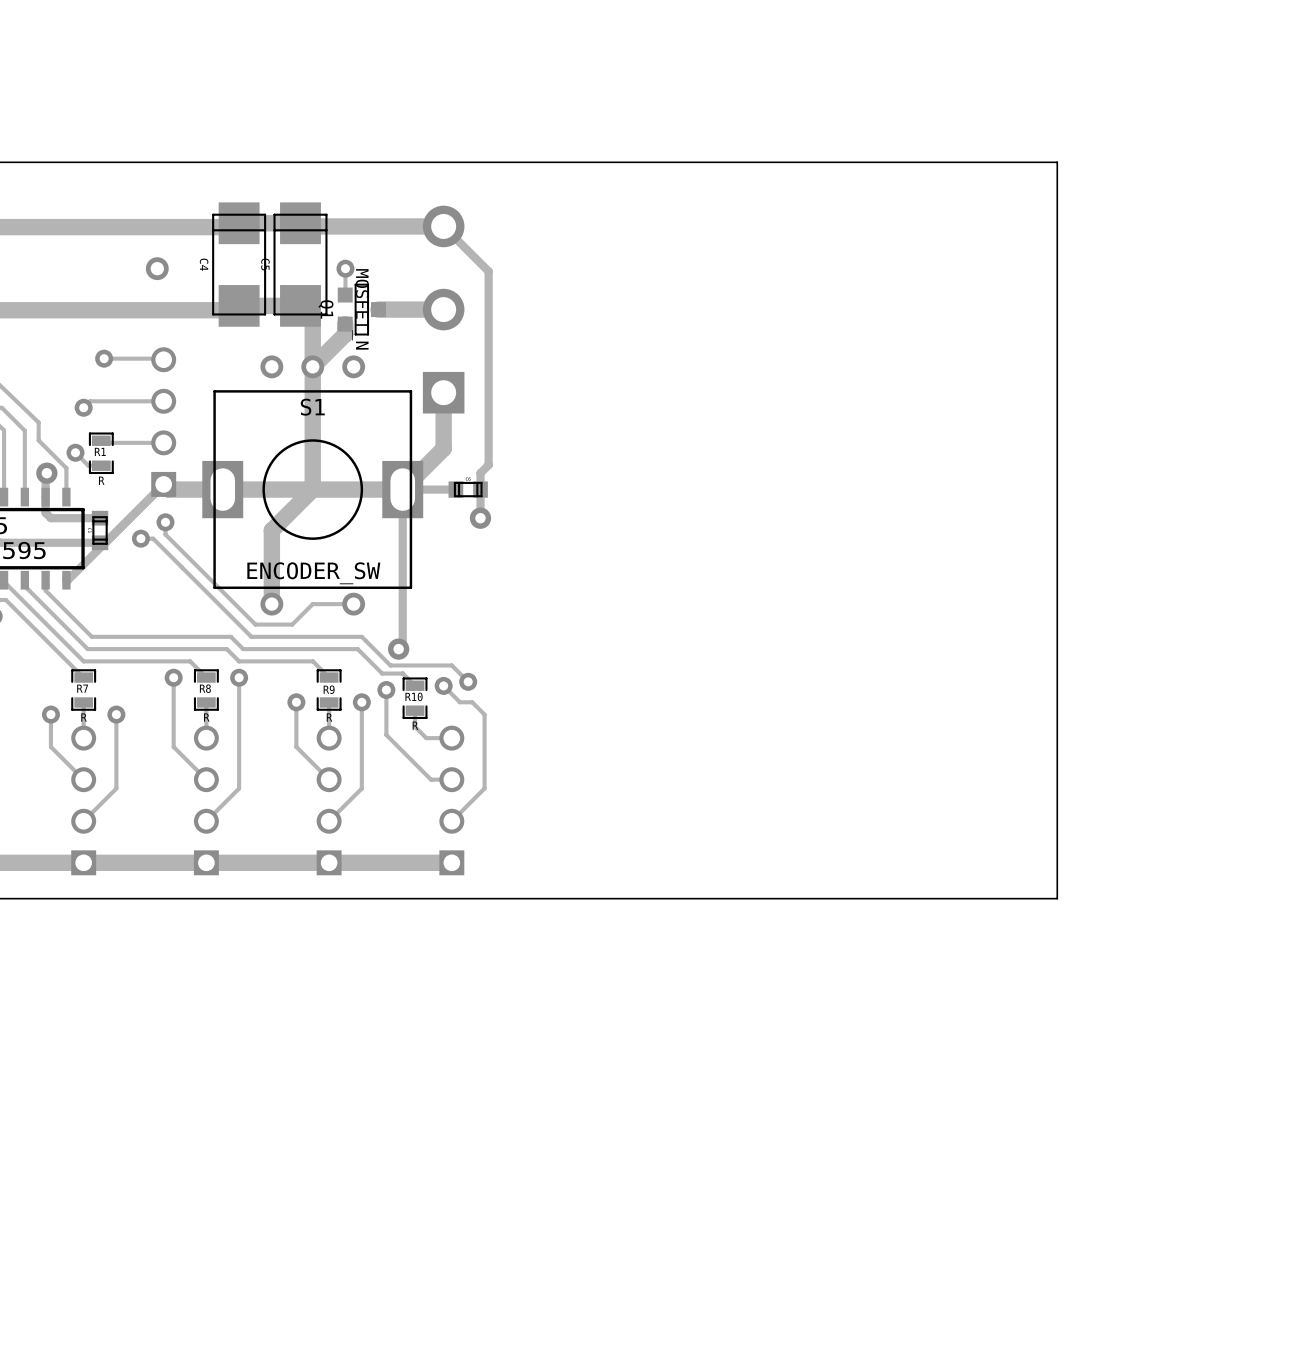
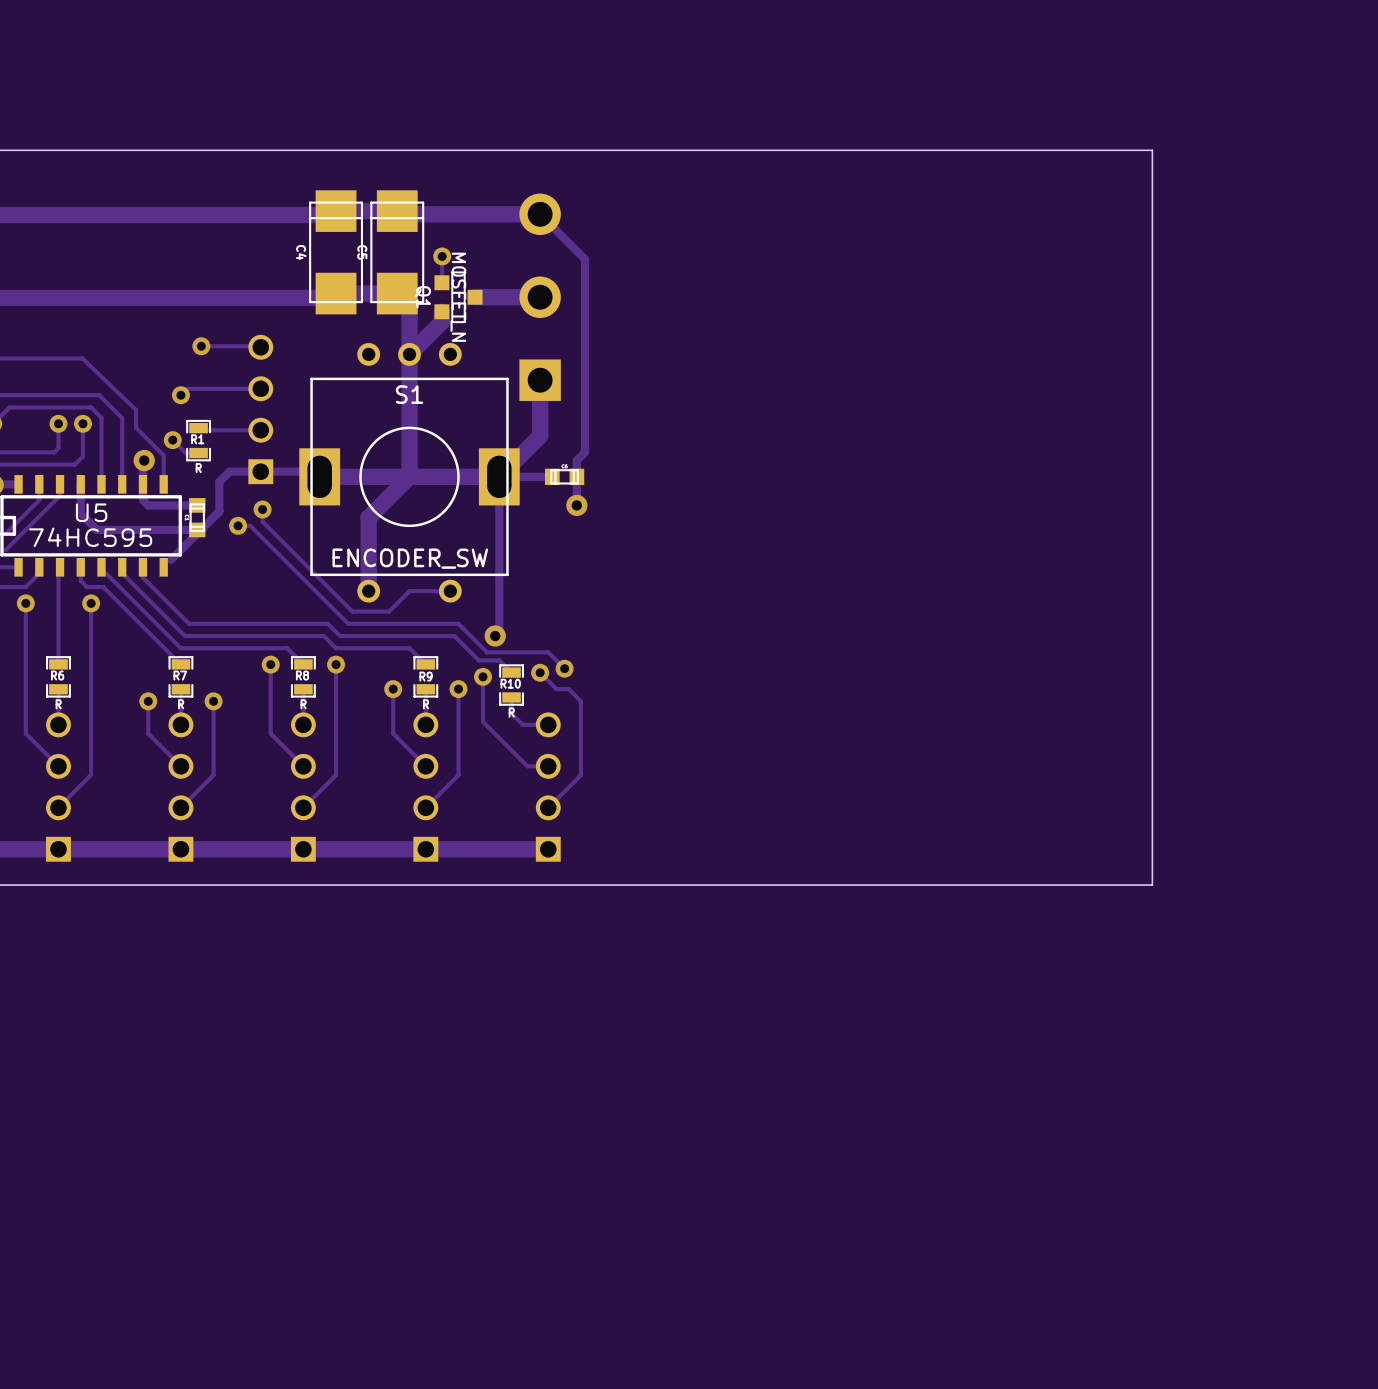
part: (157, 268) -> none
track: none -> (314, 471) (229, 471) (219, 482) (219, 511) (171, 559)
track: (222, 489) (168, 489) (163, 484) (67, 580) (66, 576) -> none

